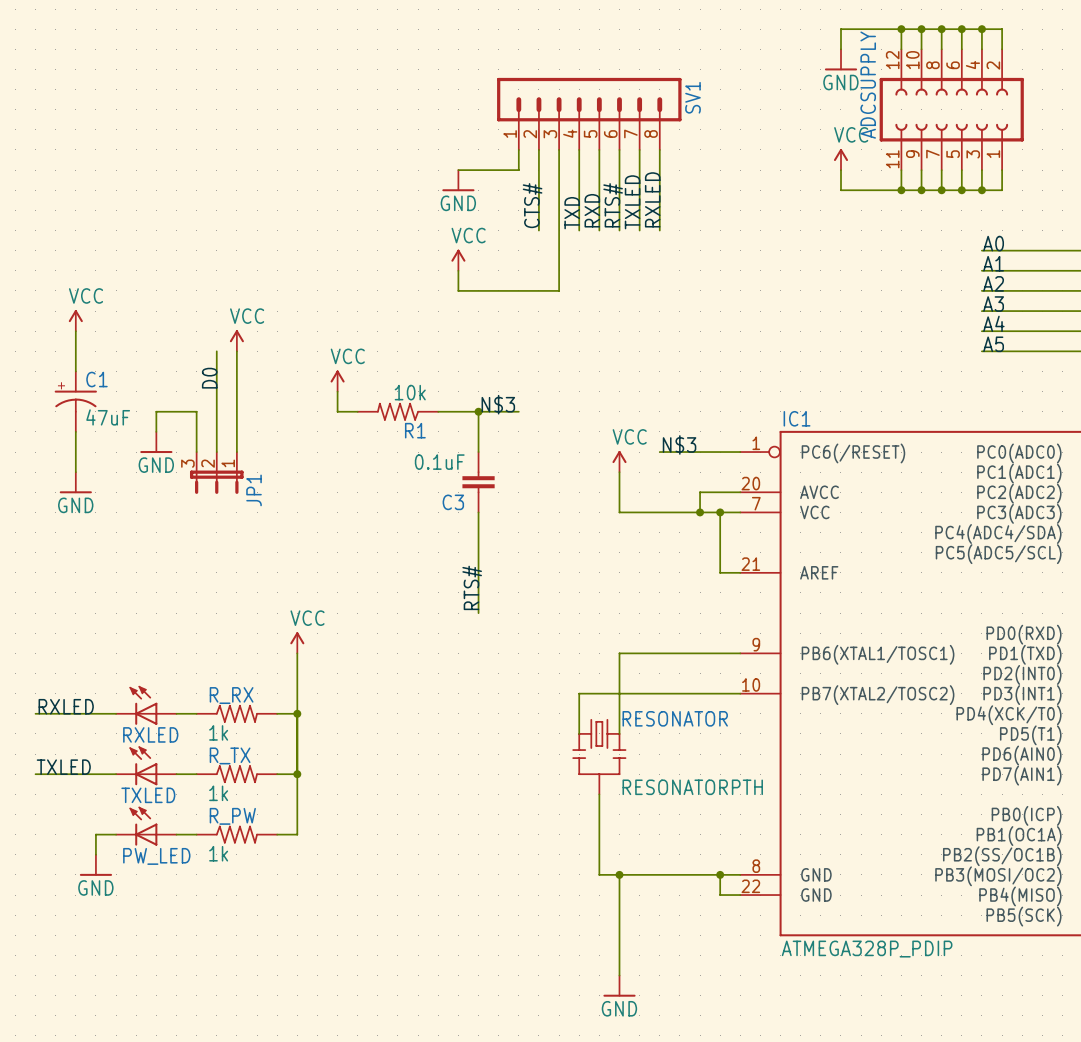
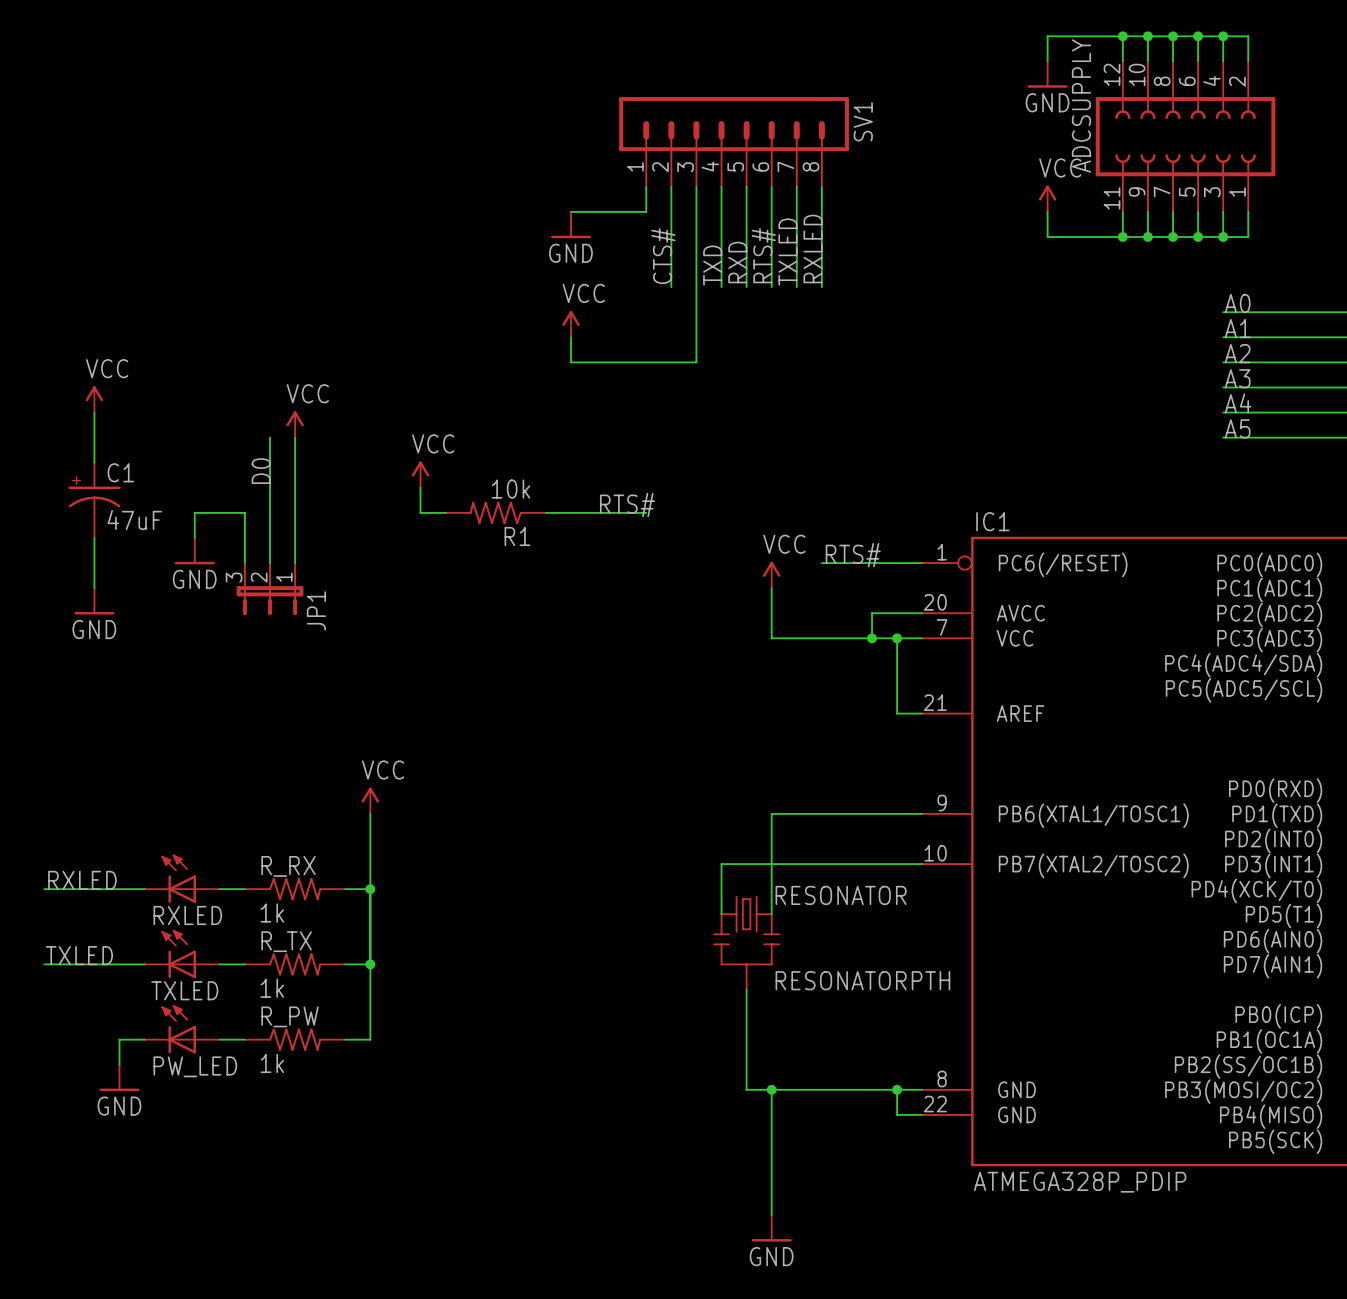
label: N$3 (498, 404) -> RTS# (627, 504)
wire: (478, 411) (478, 452) -> none
junction: (478, 411) -> none
label: N$3 (679, 444) -> RTS# (853, 555)
C3: 0.1uF (478, 482) -> none
wire: (478, 512) (478, 613) -> none
label: RTS# (472, 587) -> none

